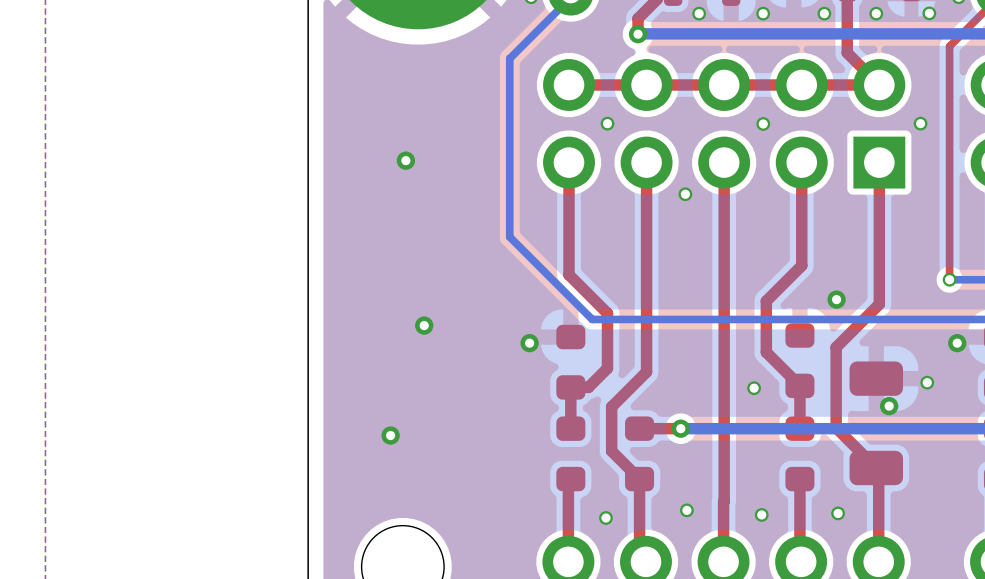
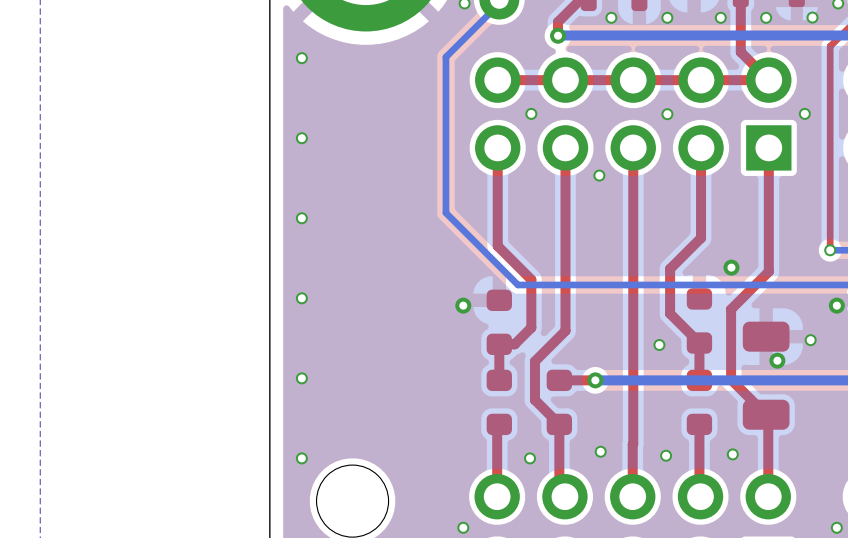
via: none -> (301, 58)
via: none -> (301, 138)
via: (405, 160) -> none
via: none -> (301, 218)
via: (424, 325) -> none
via: none -> (301, 298)
via: none -> (301, 378)
via: (390, 435) -> none
via: none -> (301, 458)

